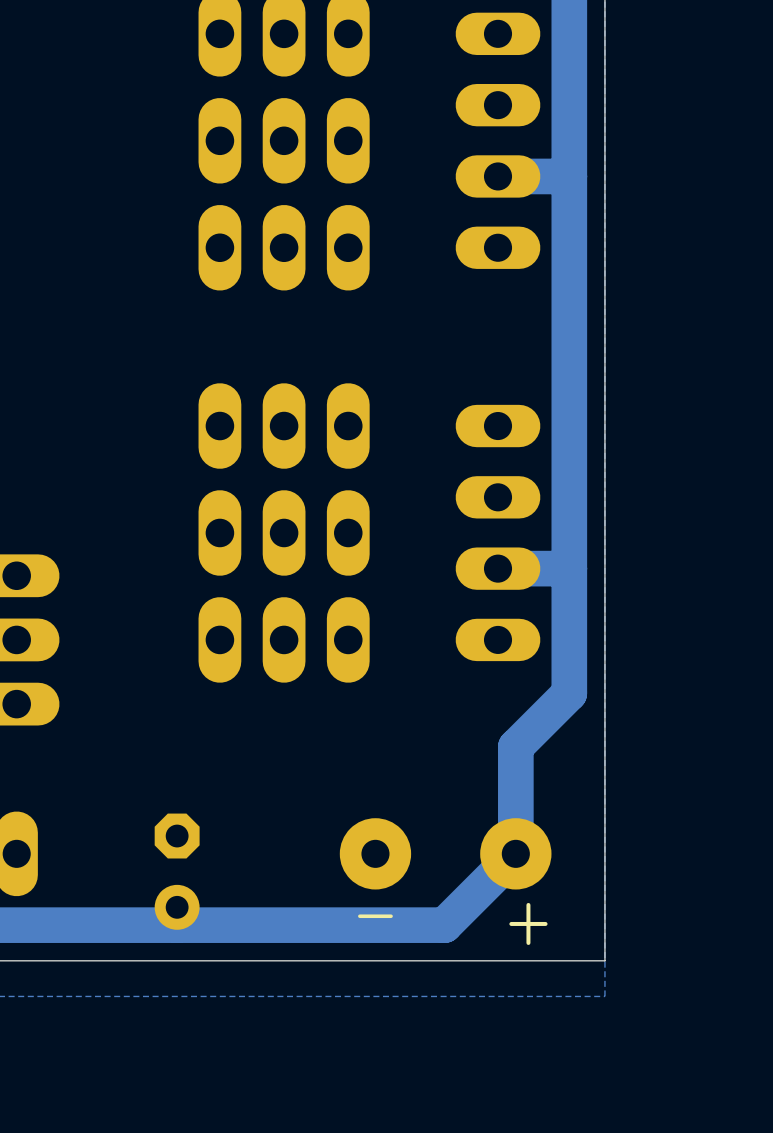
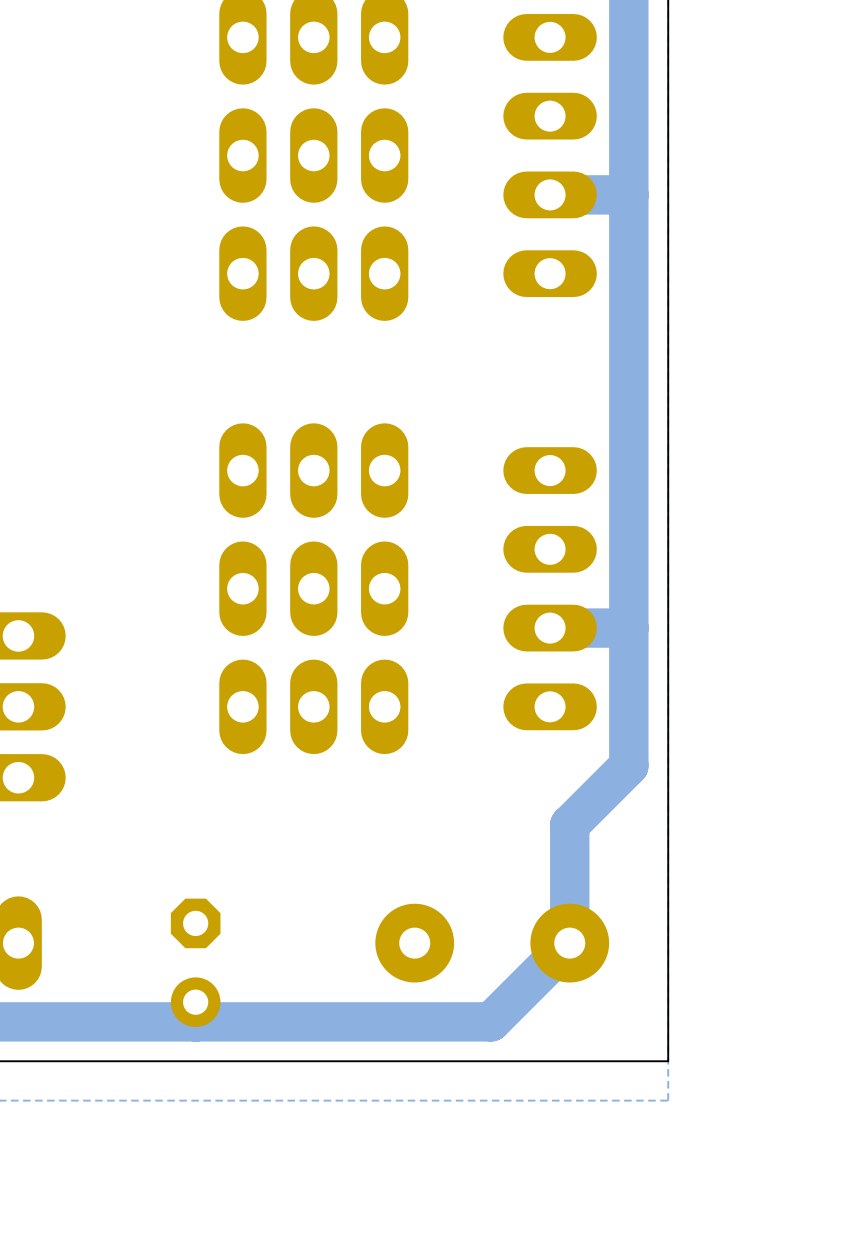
line: (391, 916) (359, 916) -> none
text: + (528, 923) -> none

